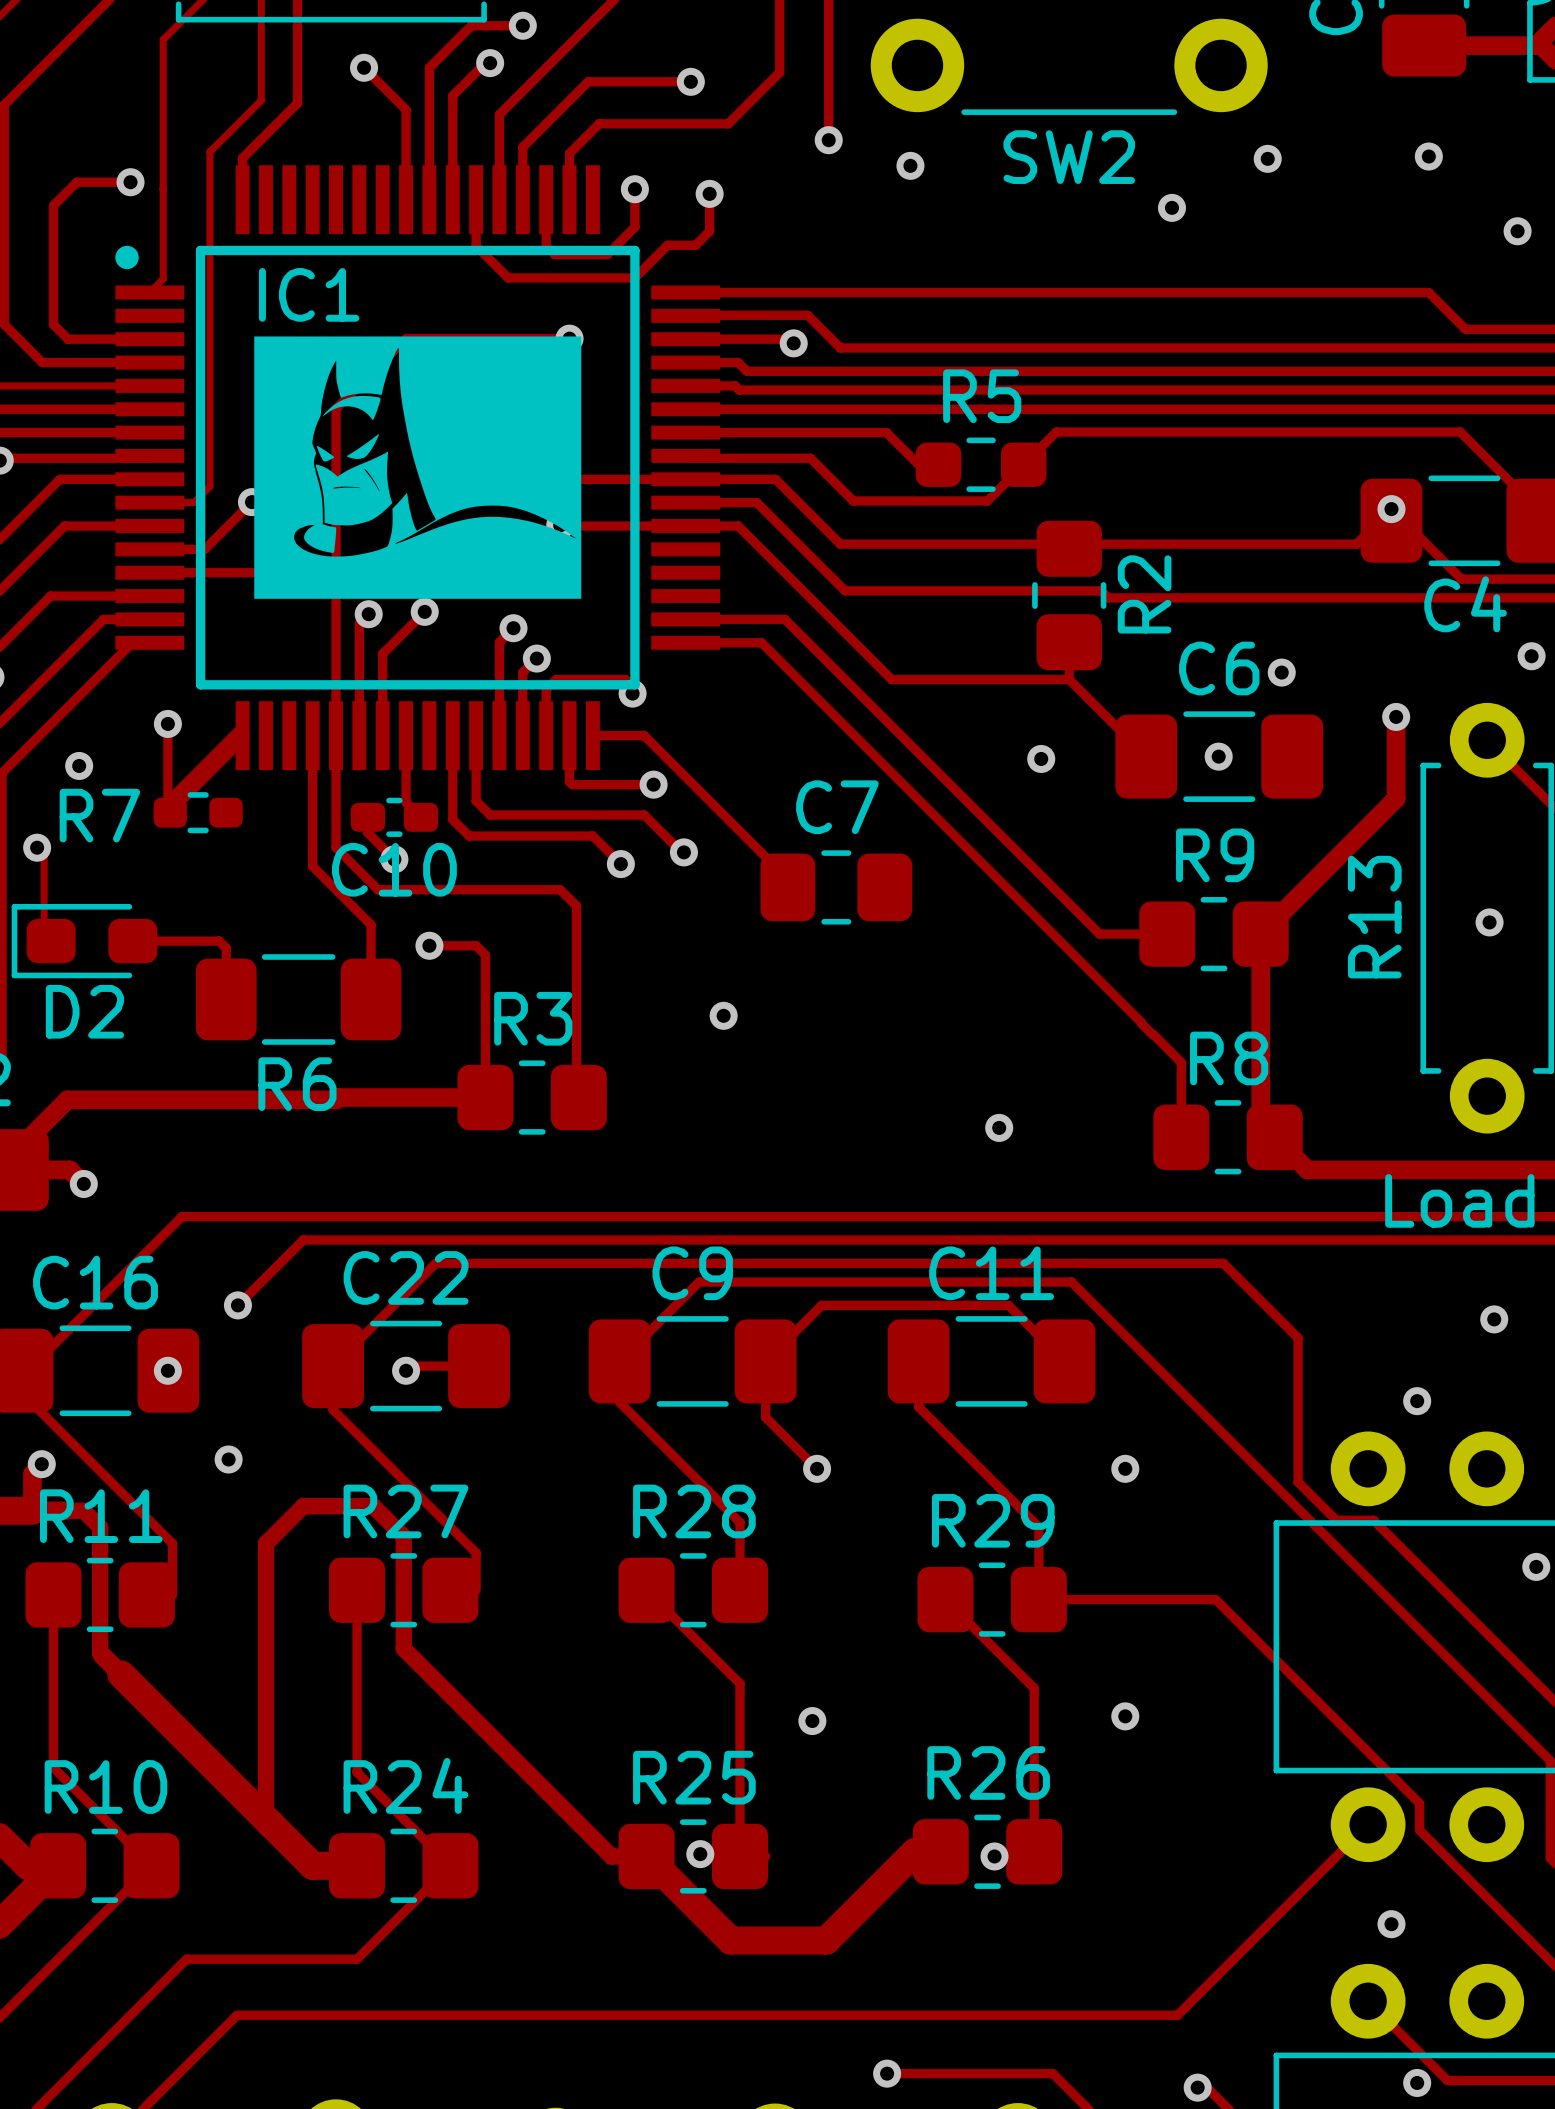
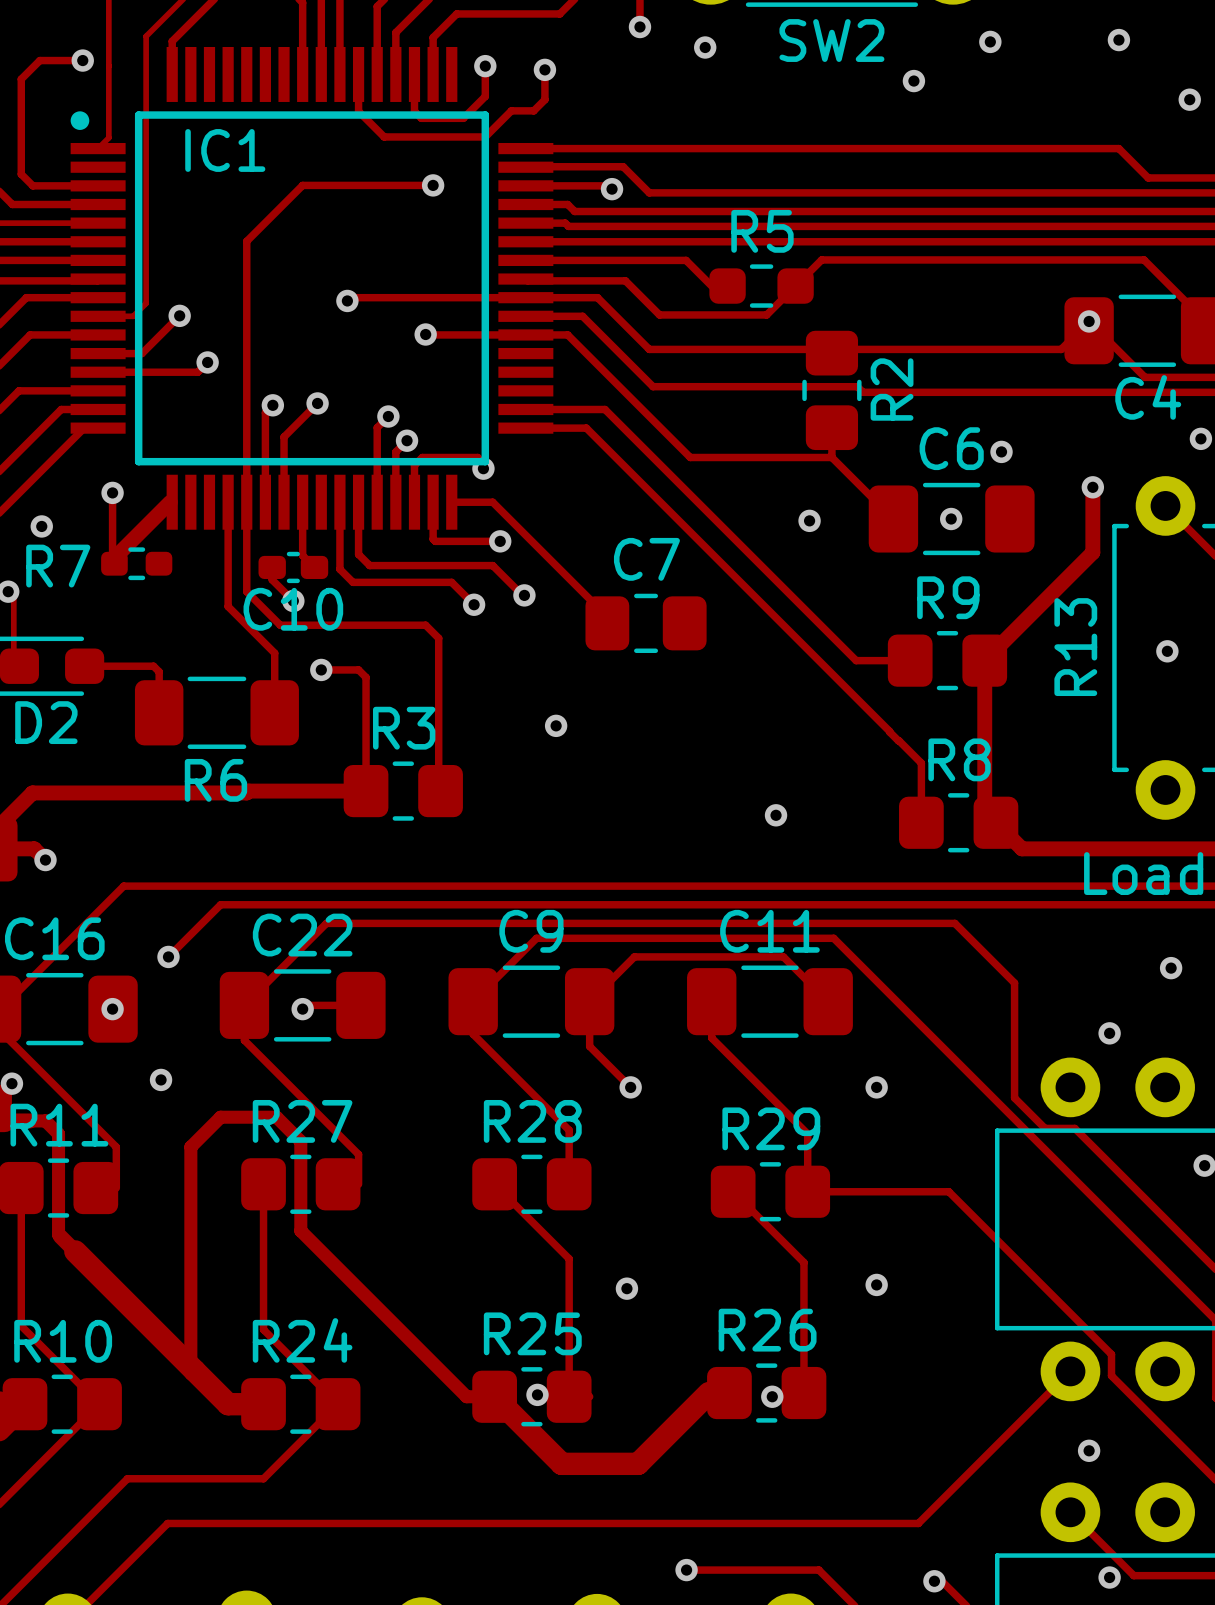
drawing: [254, 336, 582, 599] -> none

